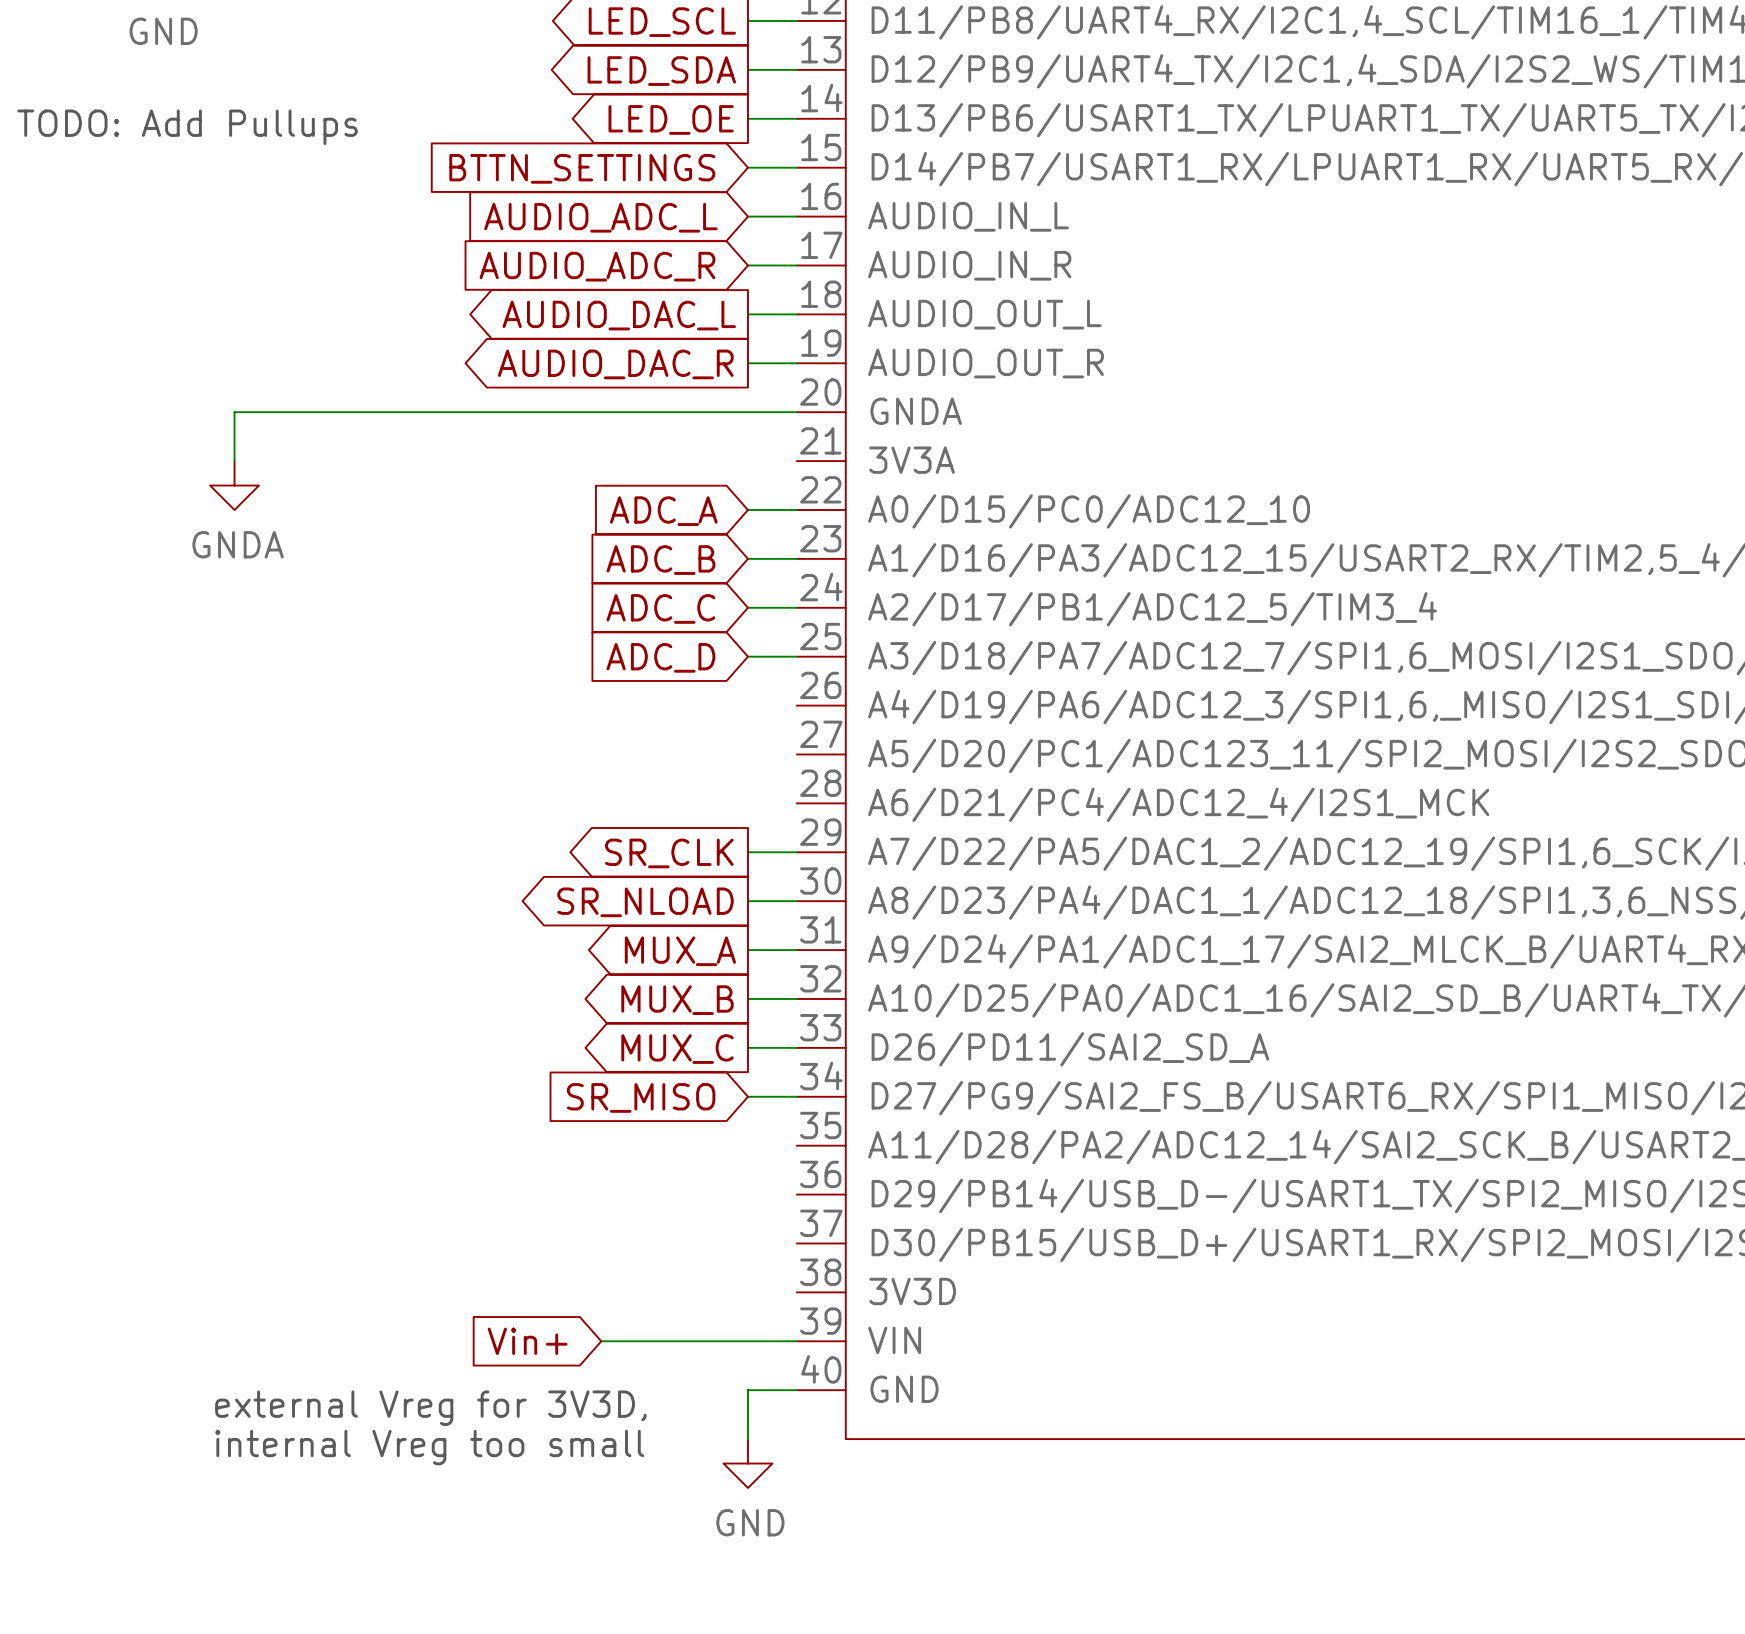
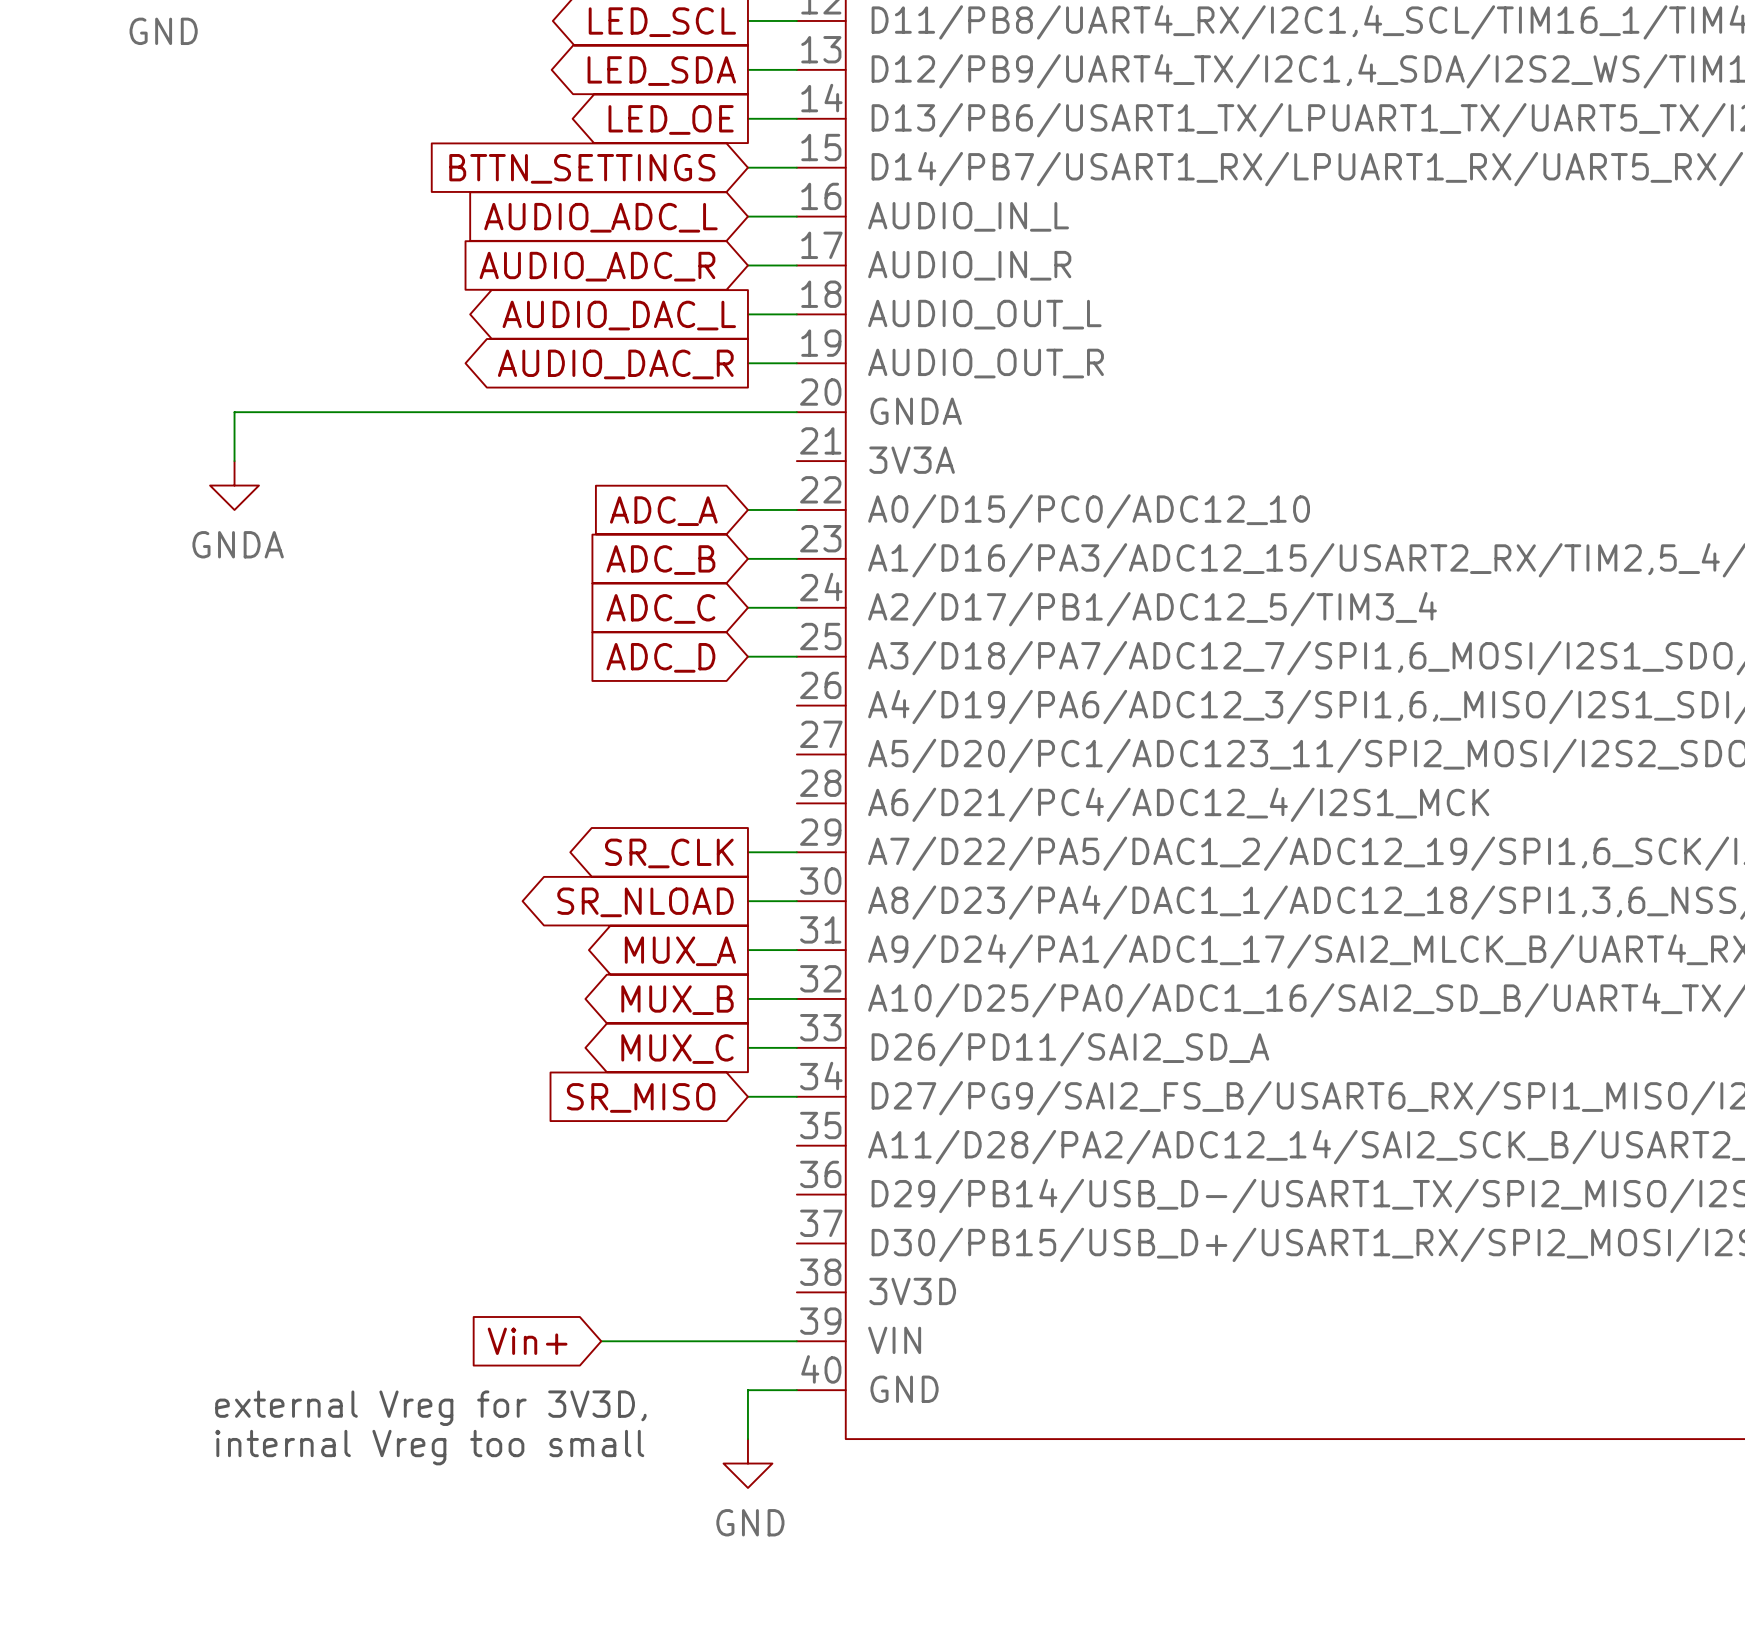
text: TODO: Add Pullups (187, 127) -> none

